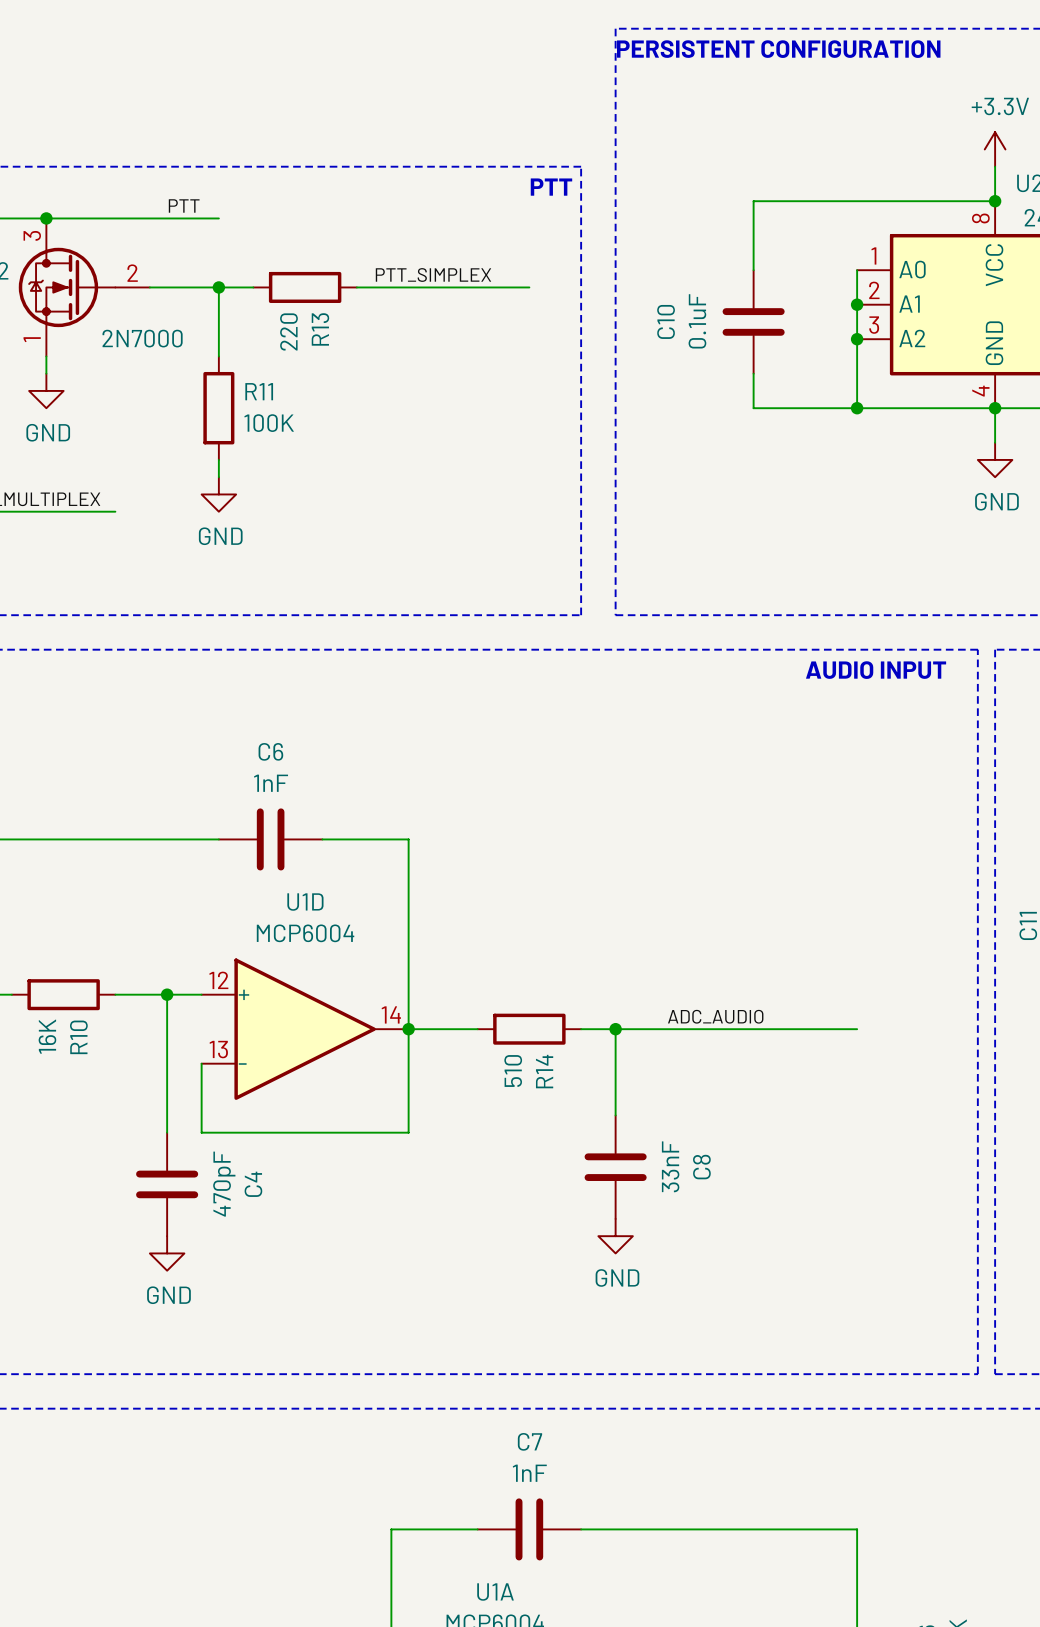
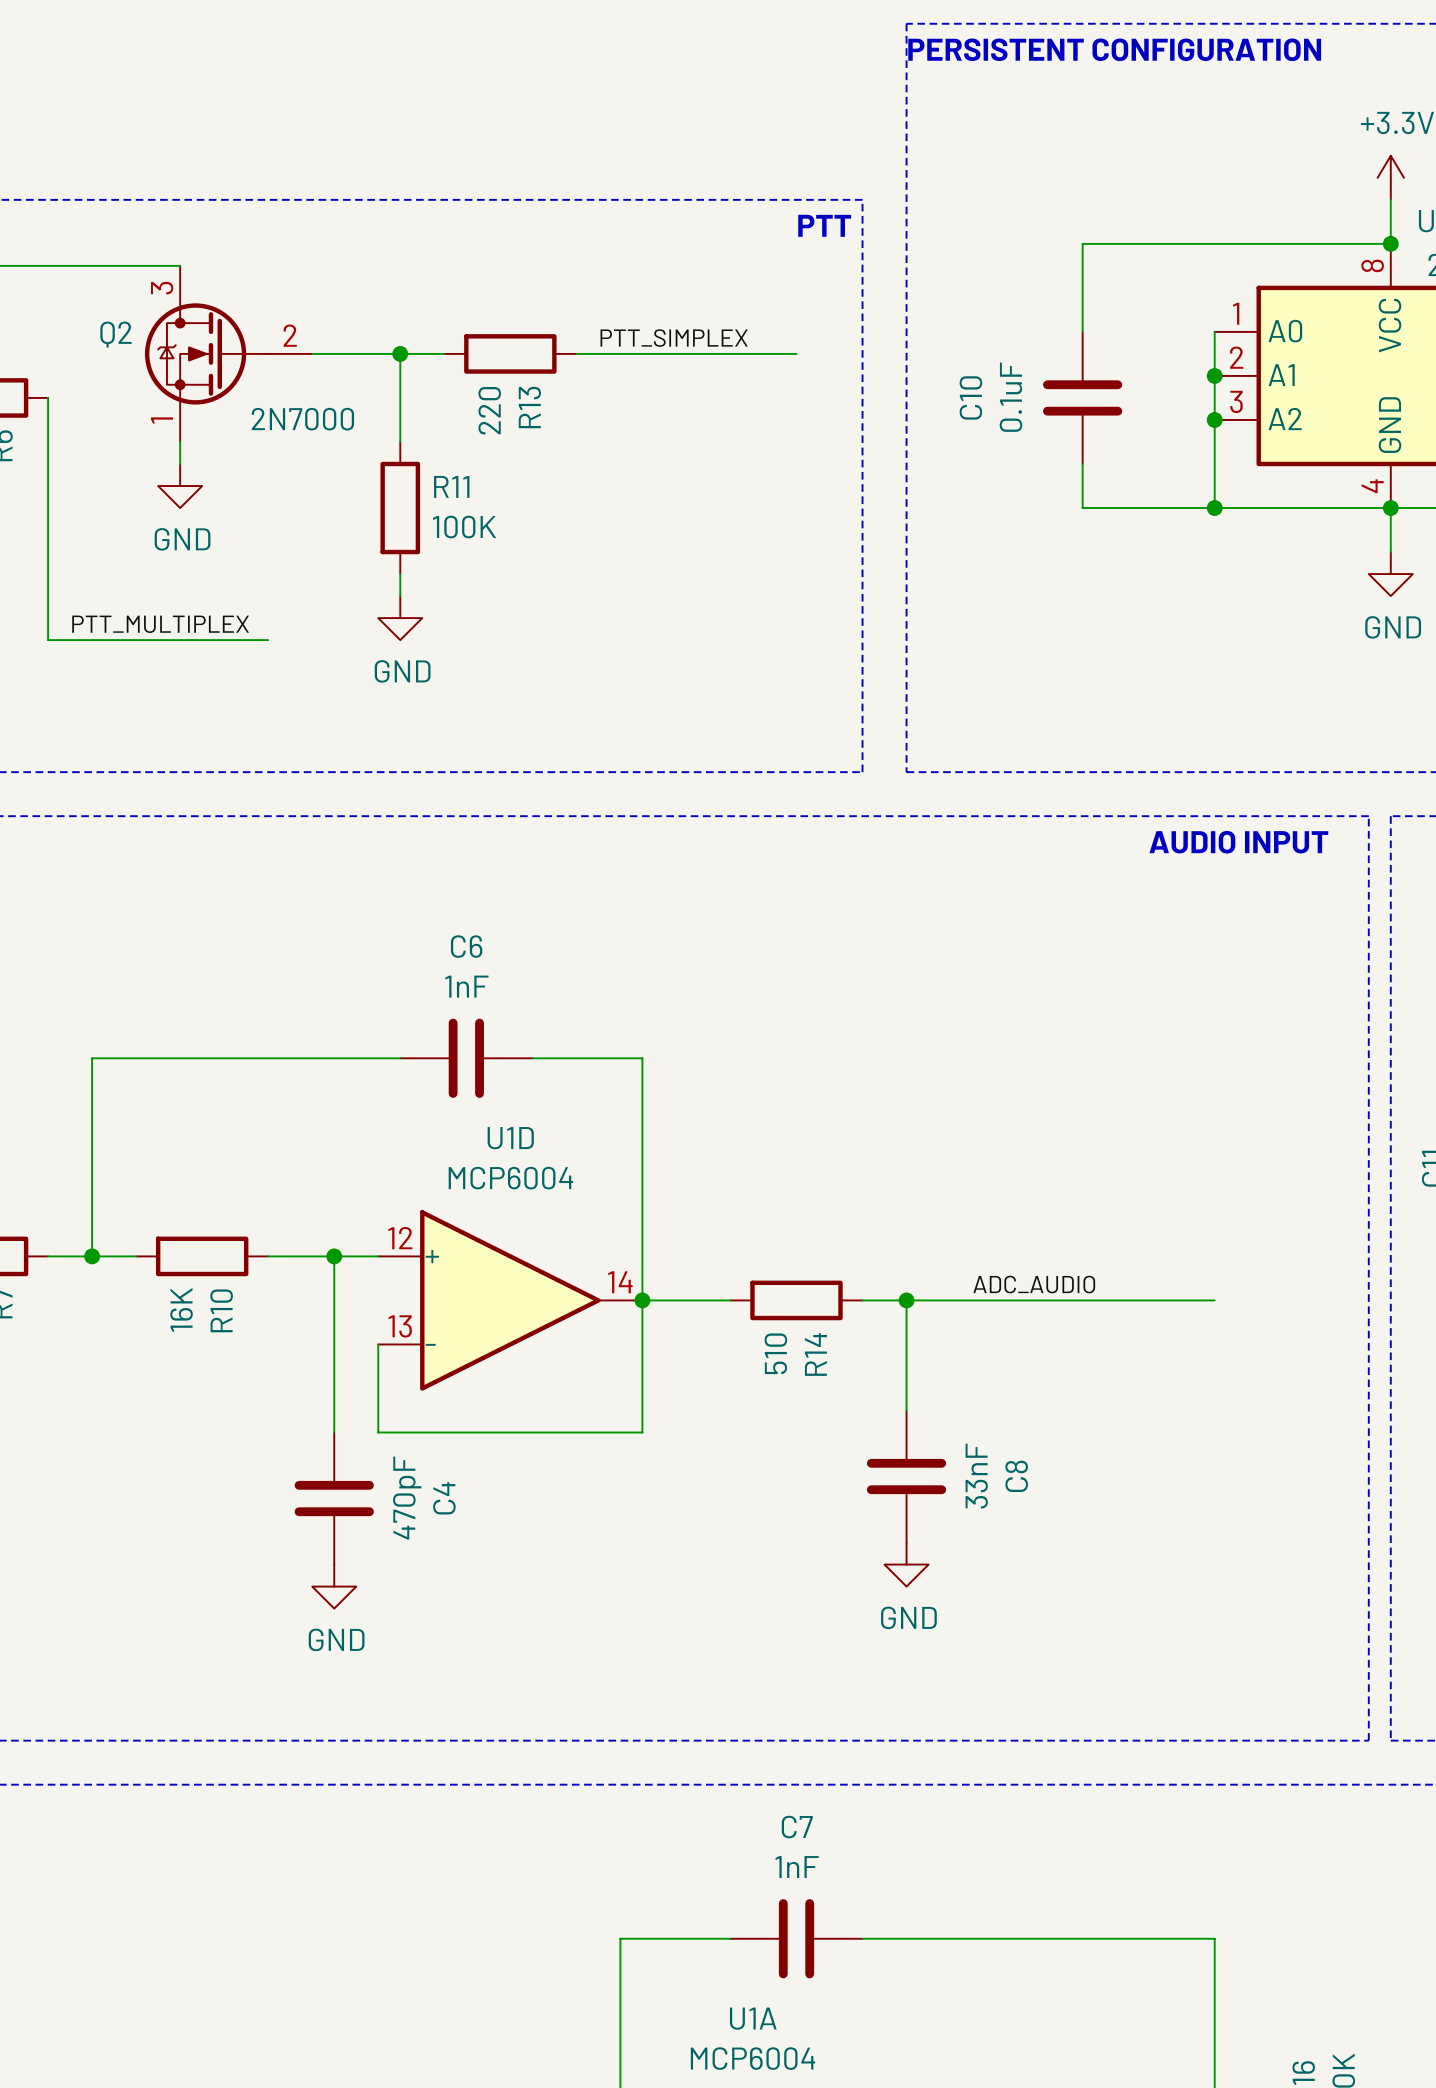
label: PTT (184, 205) -> none
wire: (46, 218) (218, 218) -> none
junction: (46, 218) -> none

